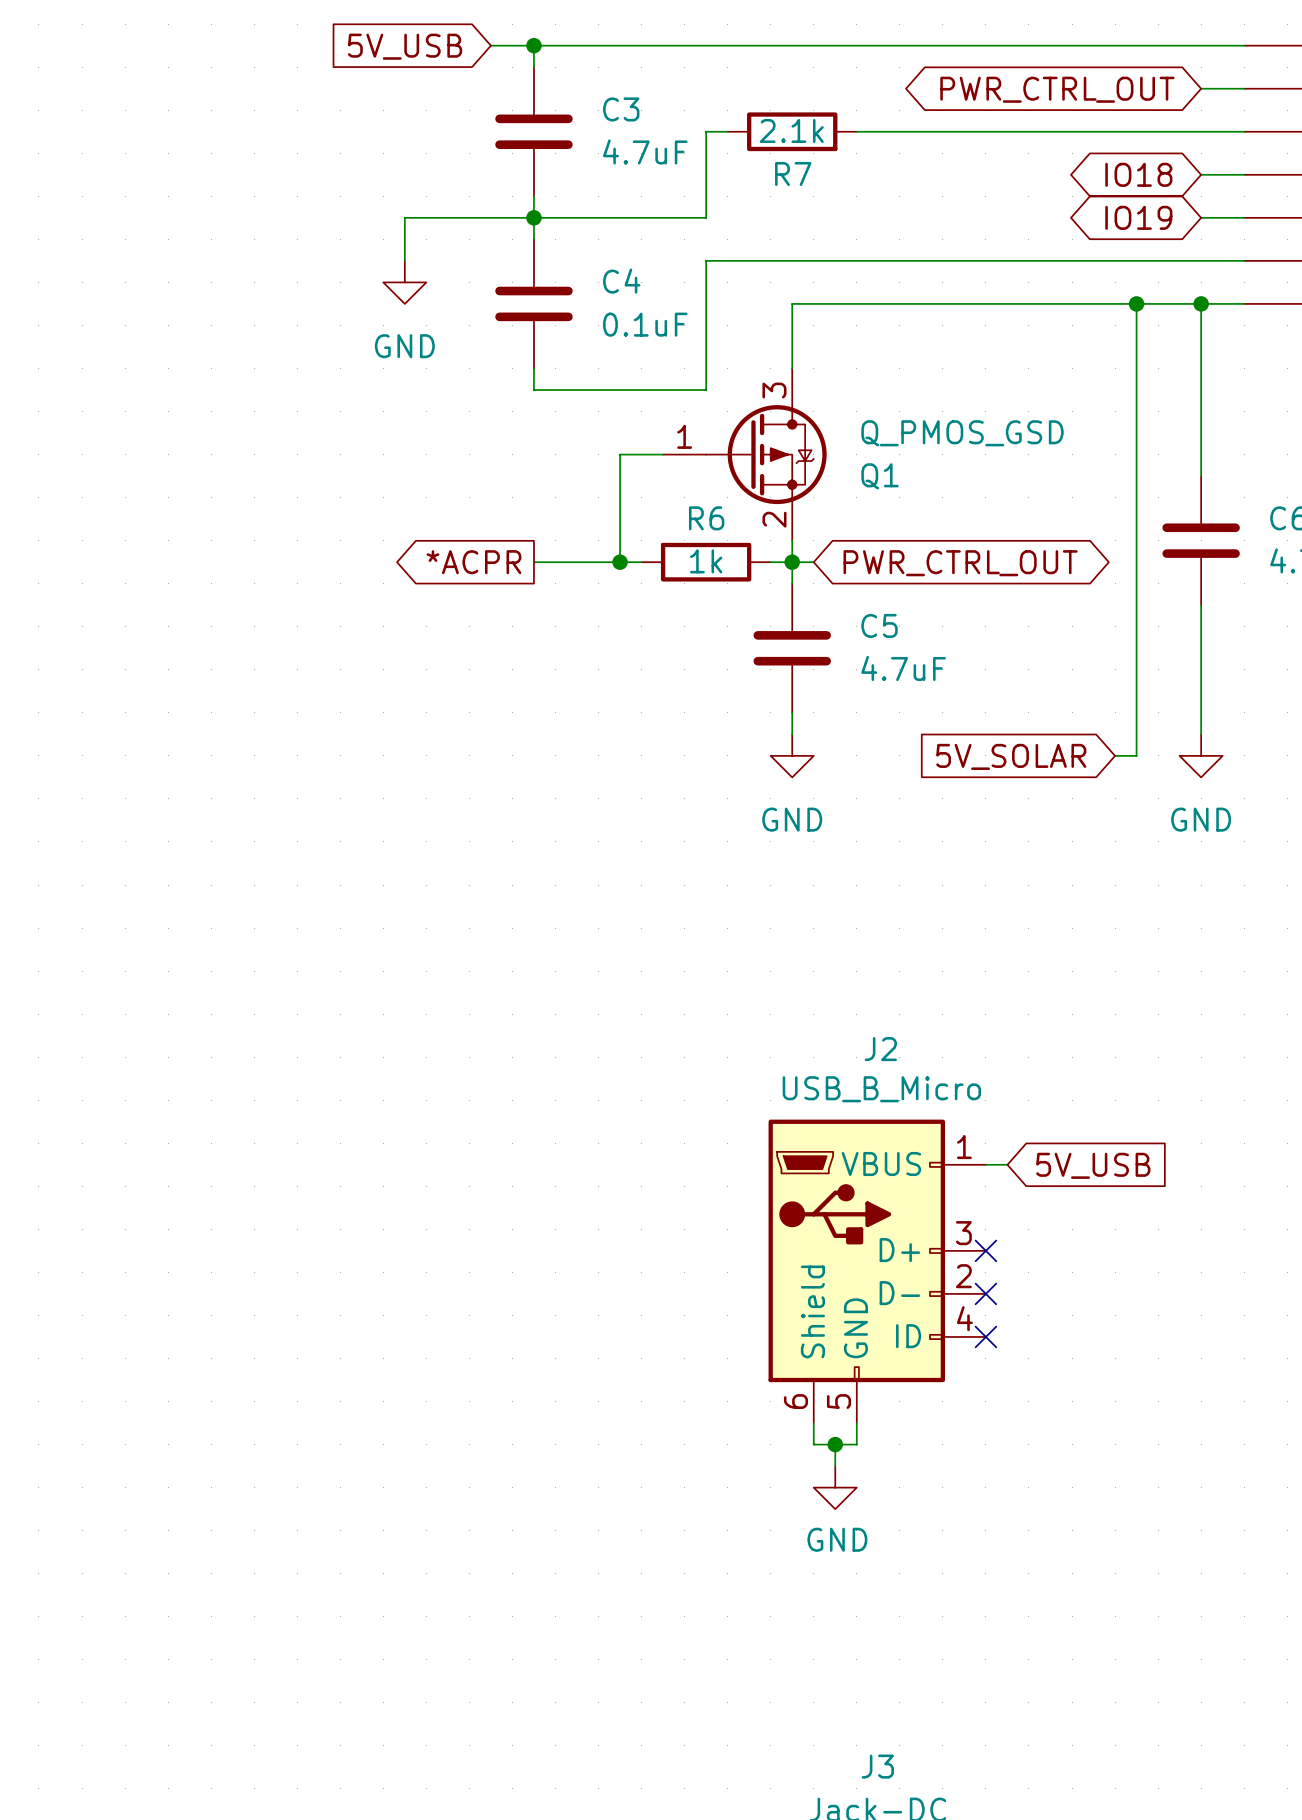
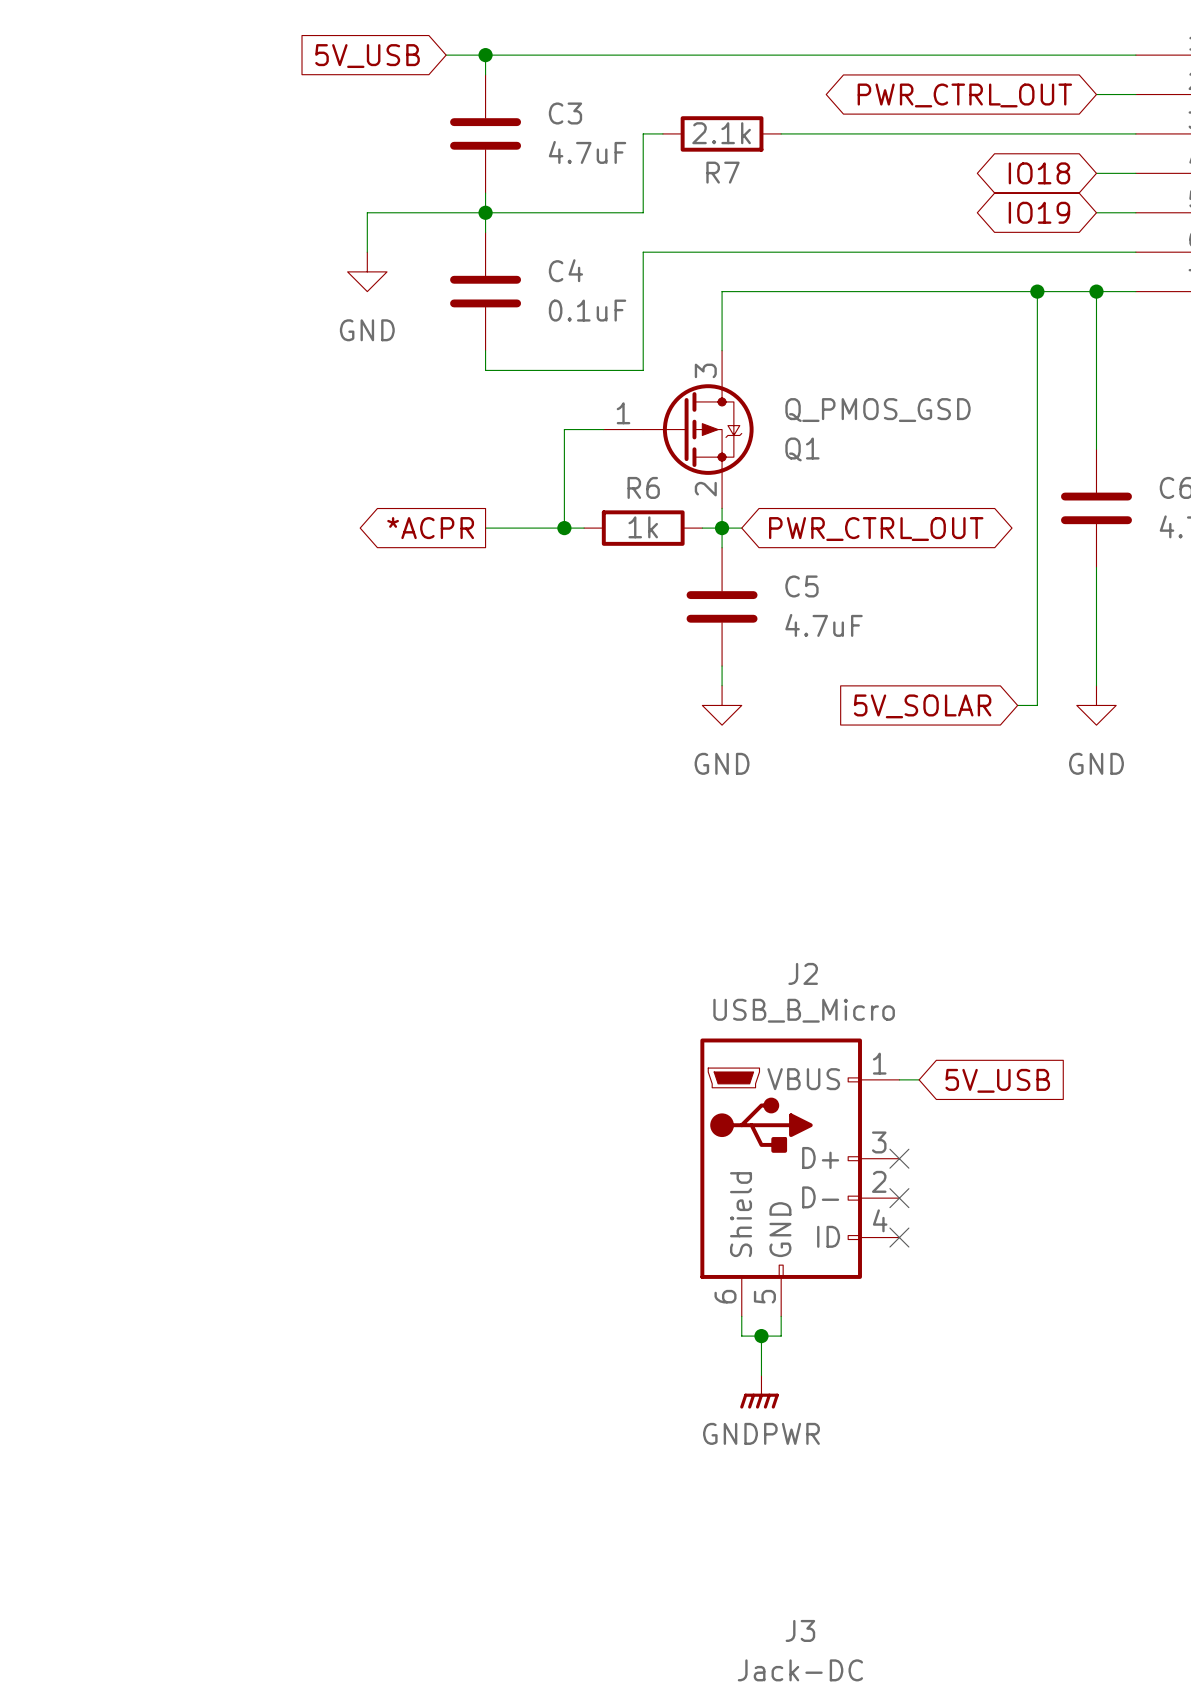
power symbol: GND (835, 1487) -> none
power symbol: none -> GNDPWR (759, 1392)

